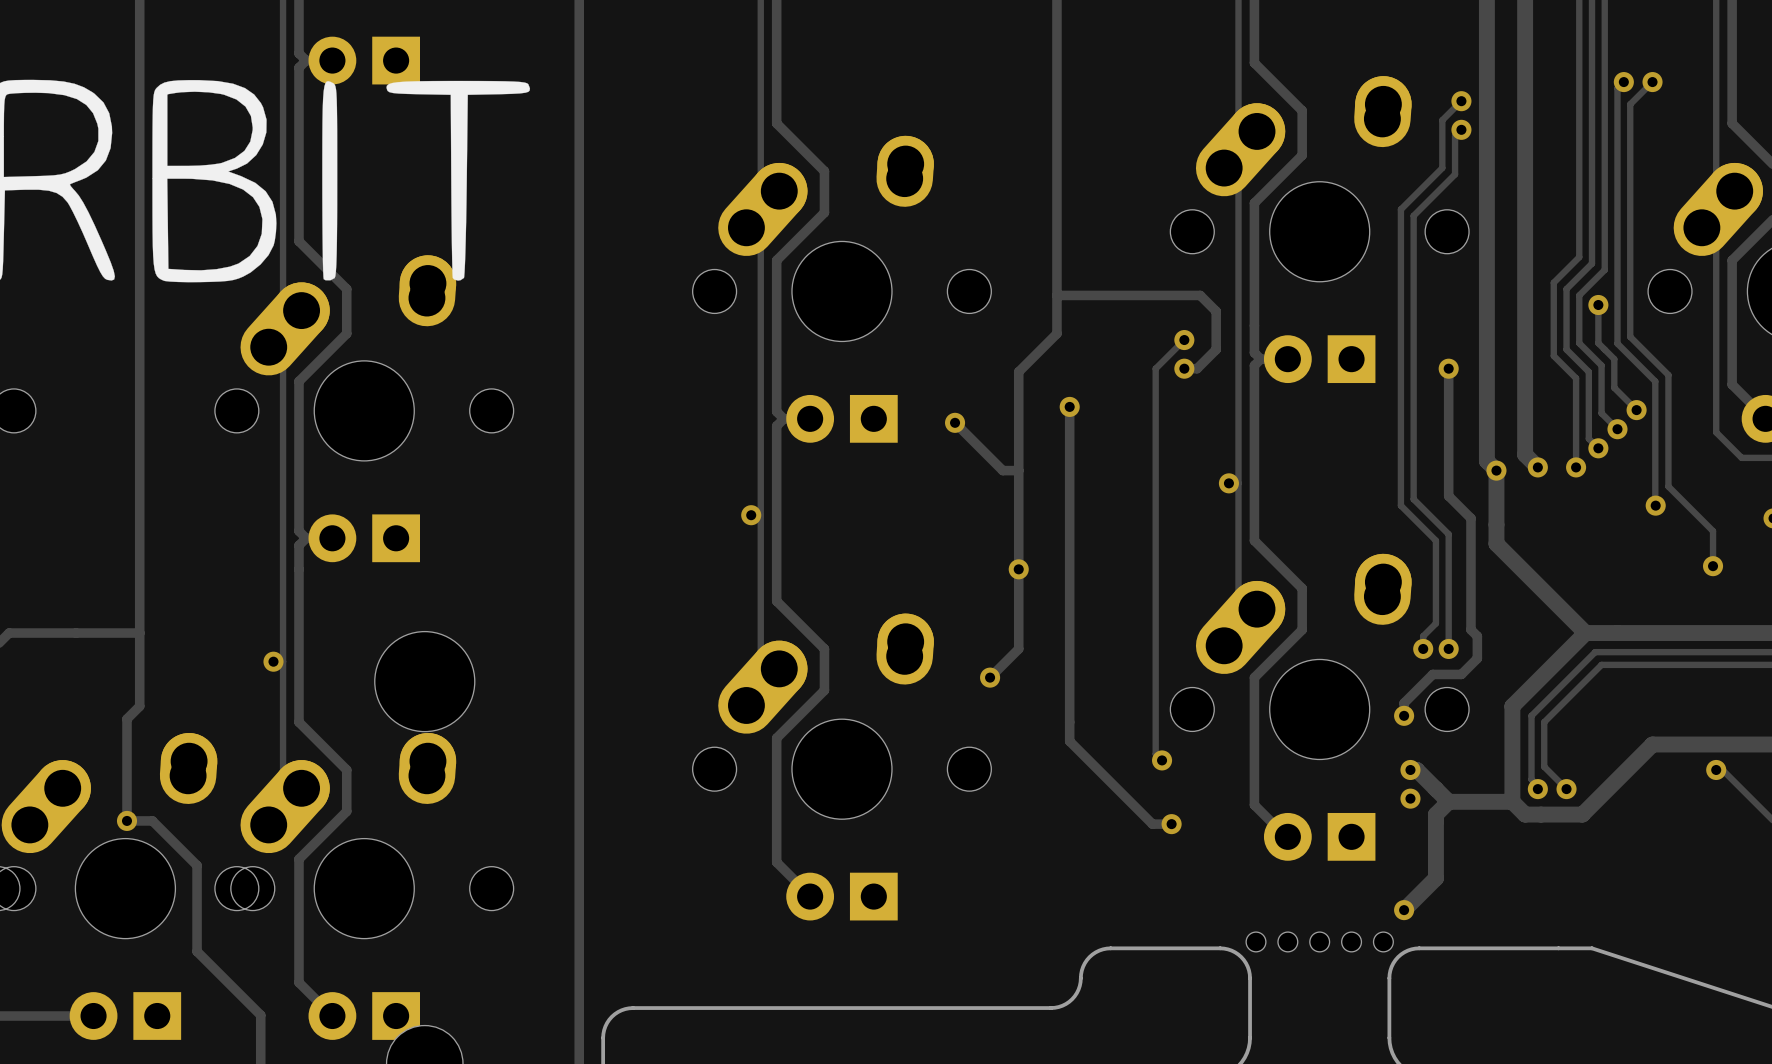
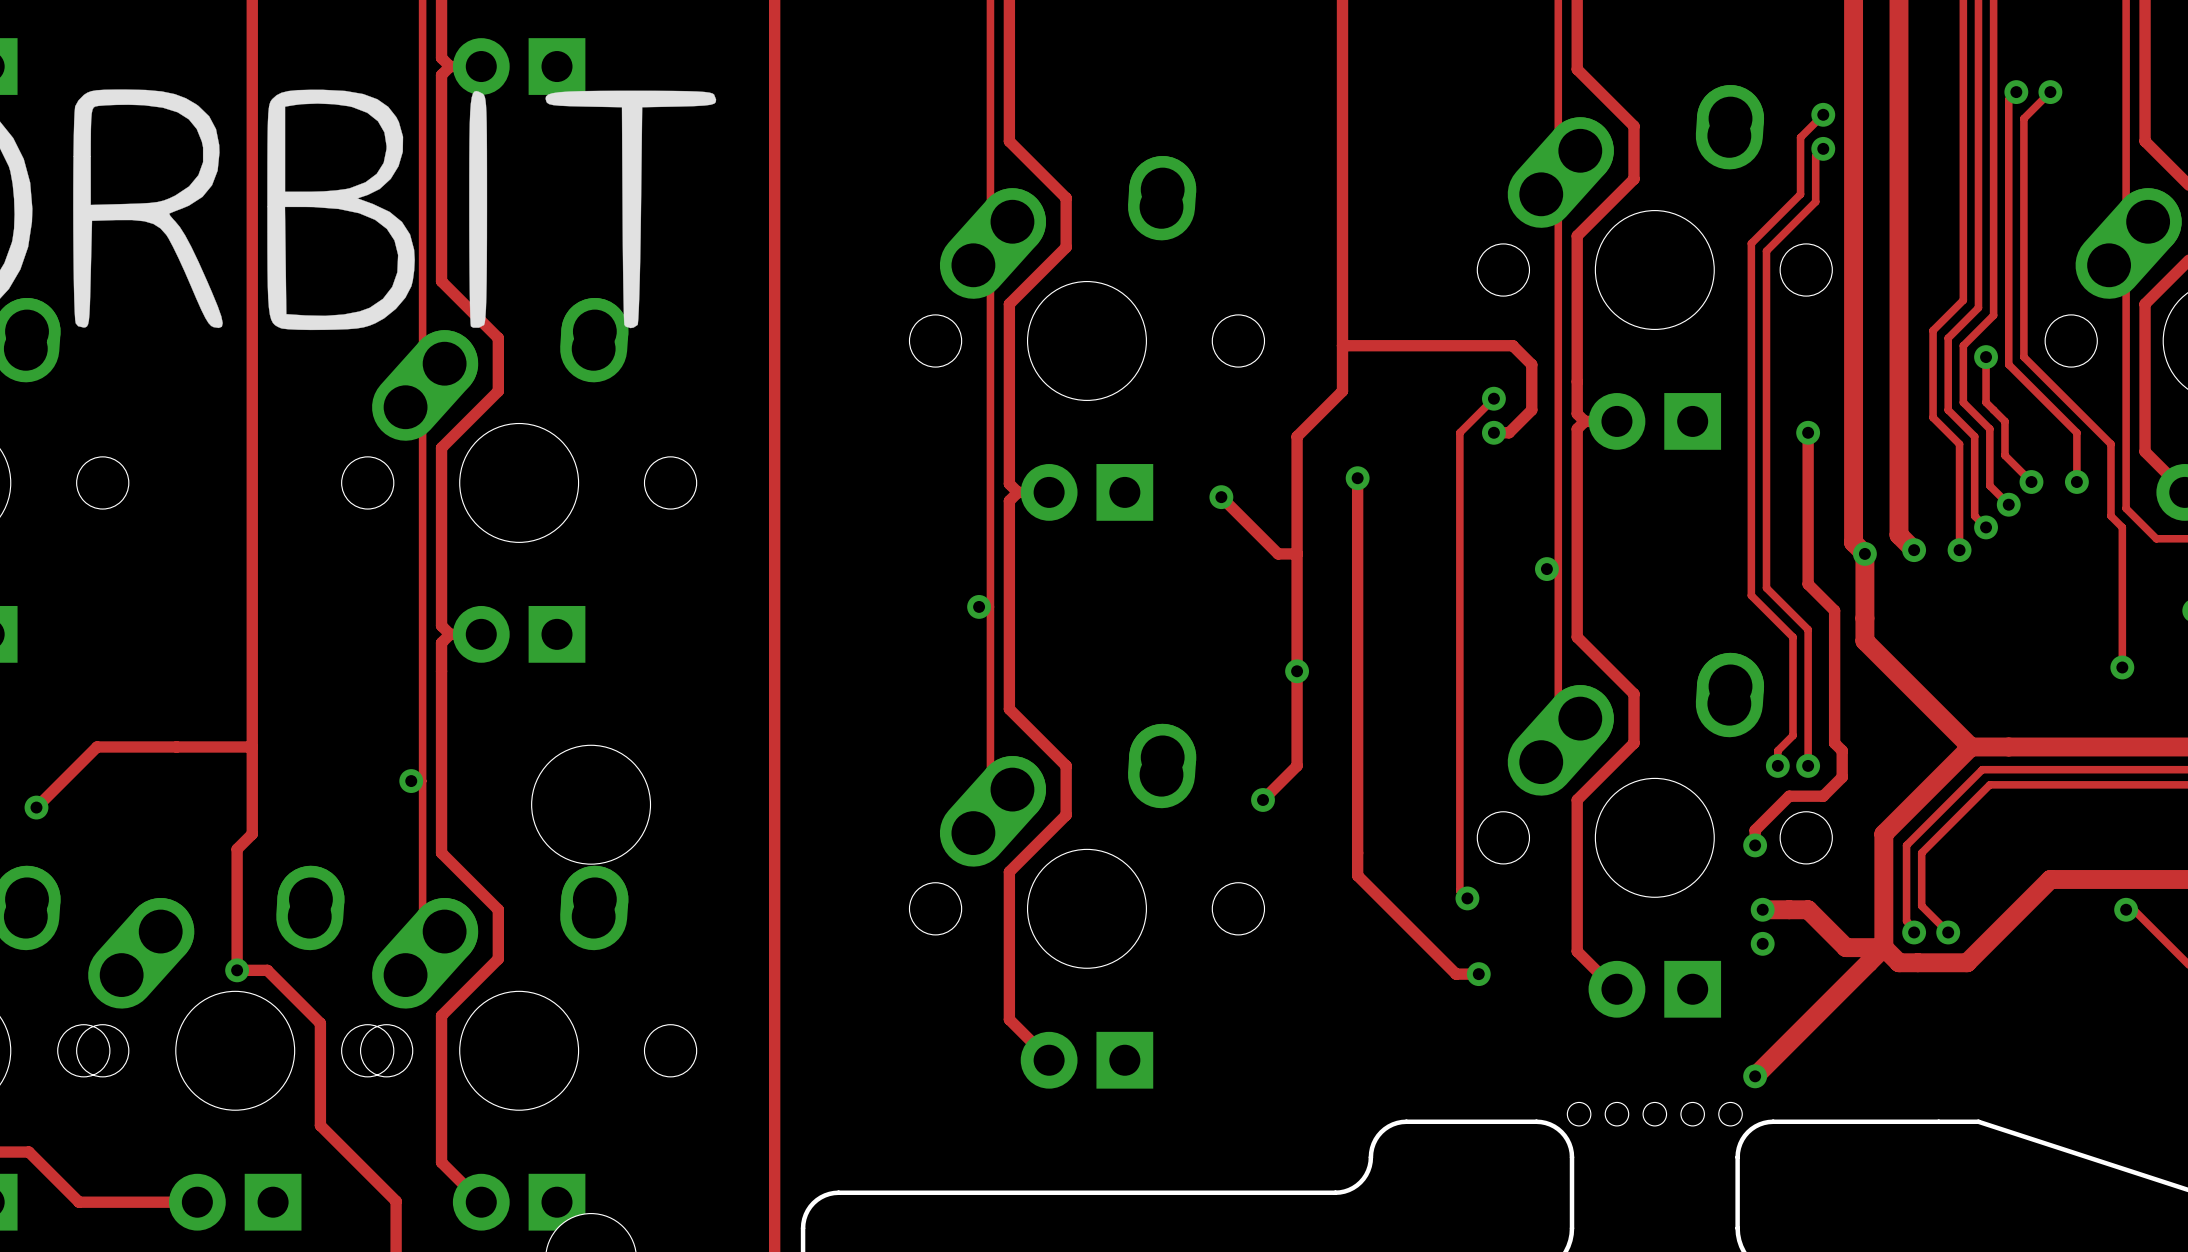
track: (1630, 305) (1630, 336) (1668, 375) (1668, 486) (1713, 531) -> (2023, 357) (2110, 444) (2110, 516) (2122, 527) (2122, 625)
track: (1617, 311) (1617, 343) (1655, 381) (1655, 505) -> (2008, 364) (2076, 432) (2076, 482)
via position: (1655, 505) -> (2076, 482)
track: (1416, 769) (1448, 801) -> (1770, 909) (1808, 909) (1845, 947)
track: (1448, 801) (1435, 814) (1435, 878) -> (1883, 947) (1792, 1038)
track: (1448, 801) (1480, 801) -> none

